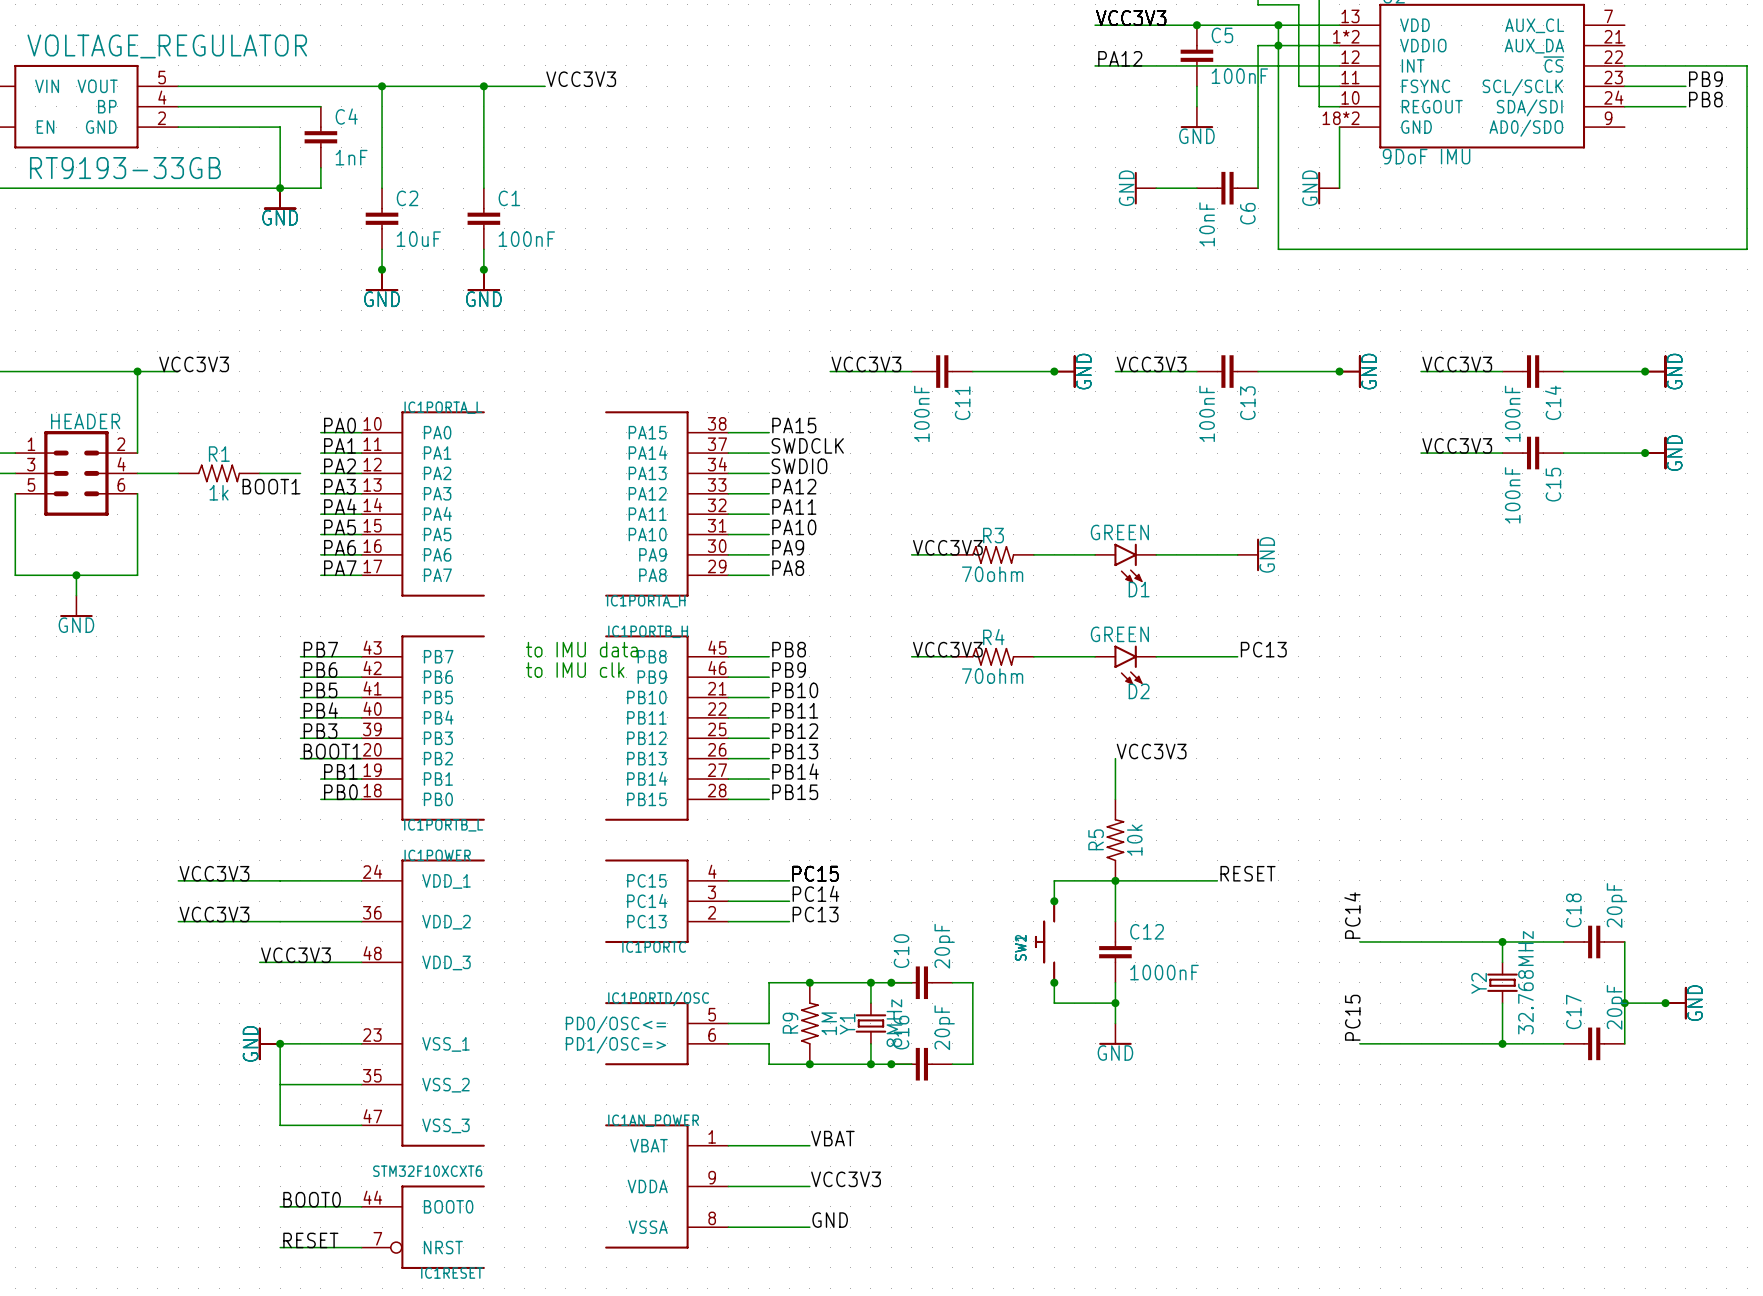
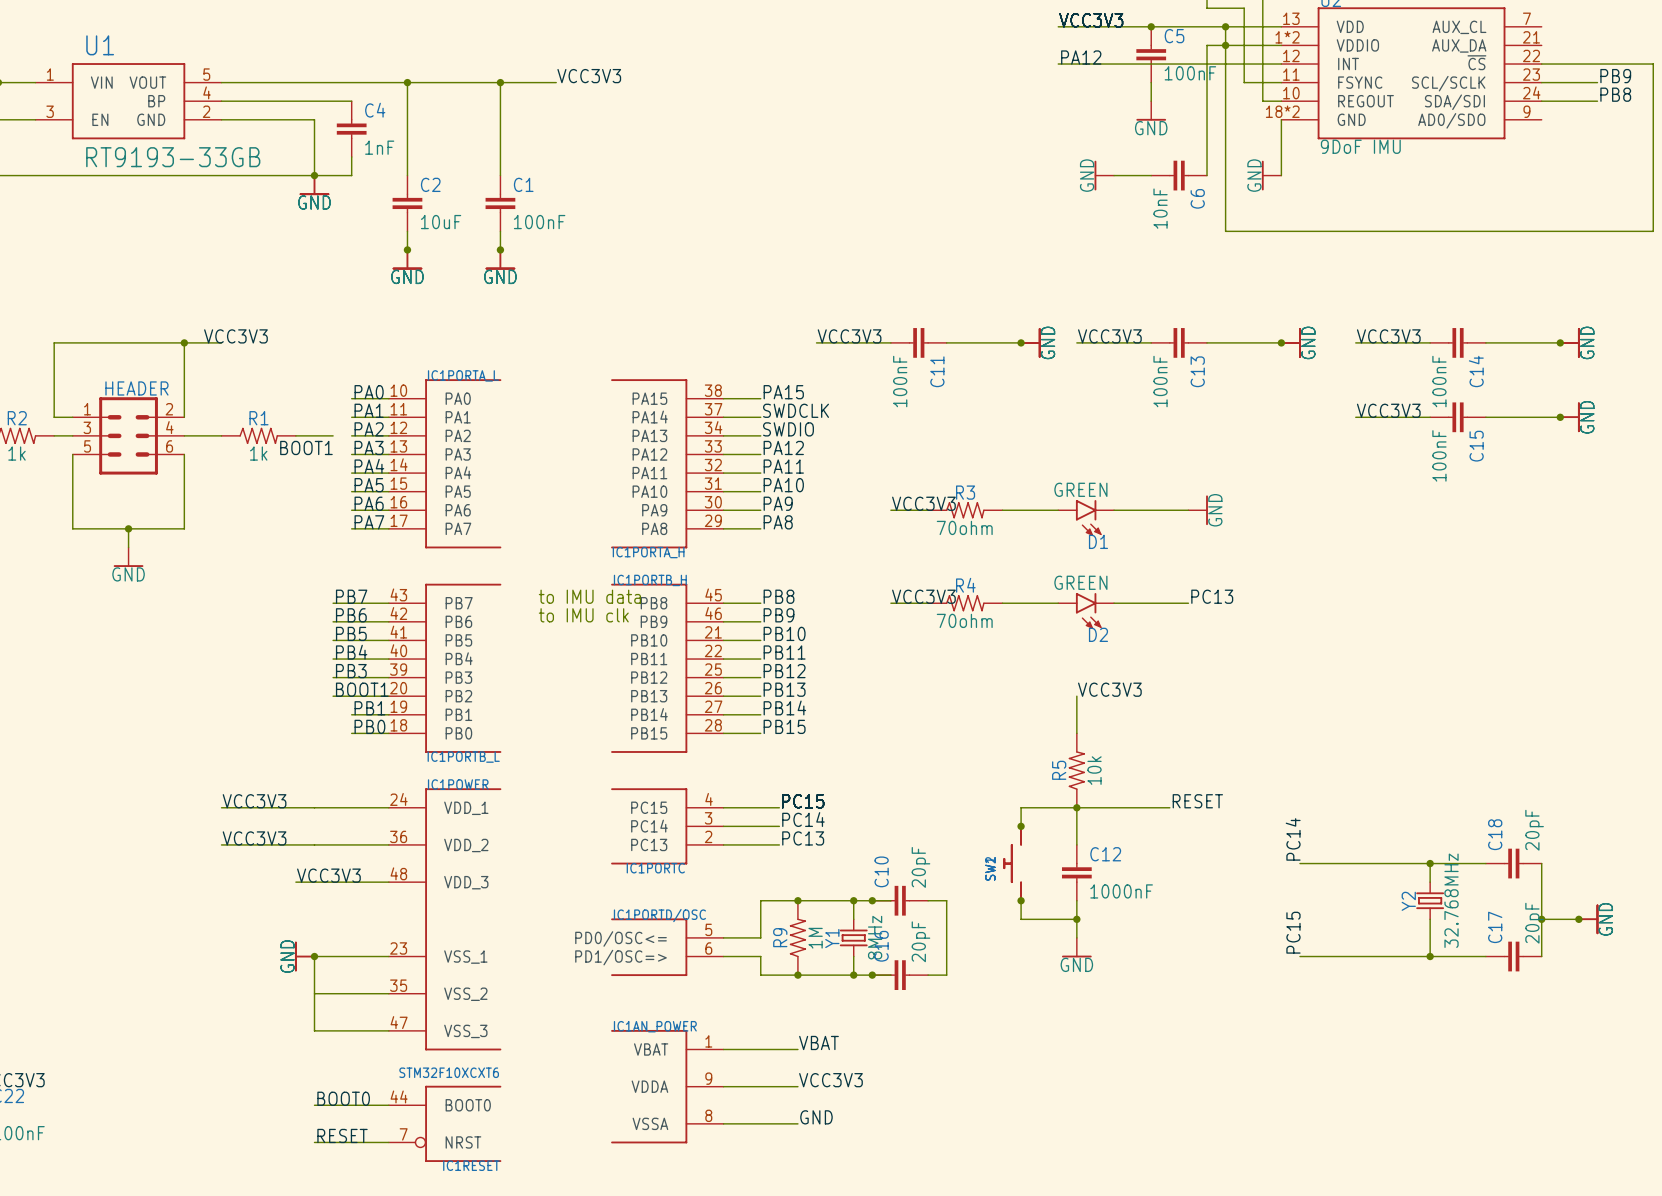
VOLTAGE_REGULATOR name: VOLTAGE_REGULATOR (167, 46) -> U1 (100, 45)

